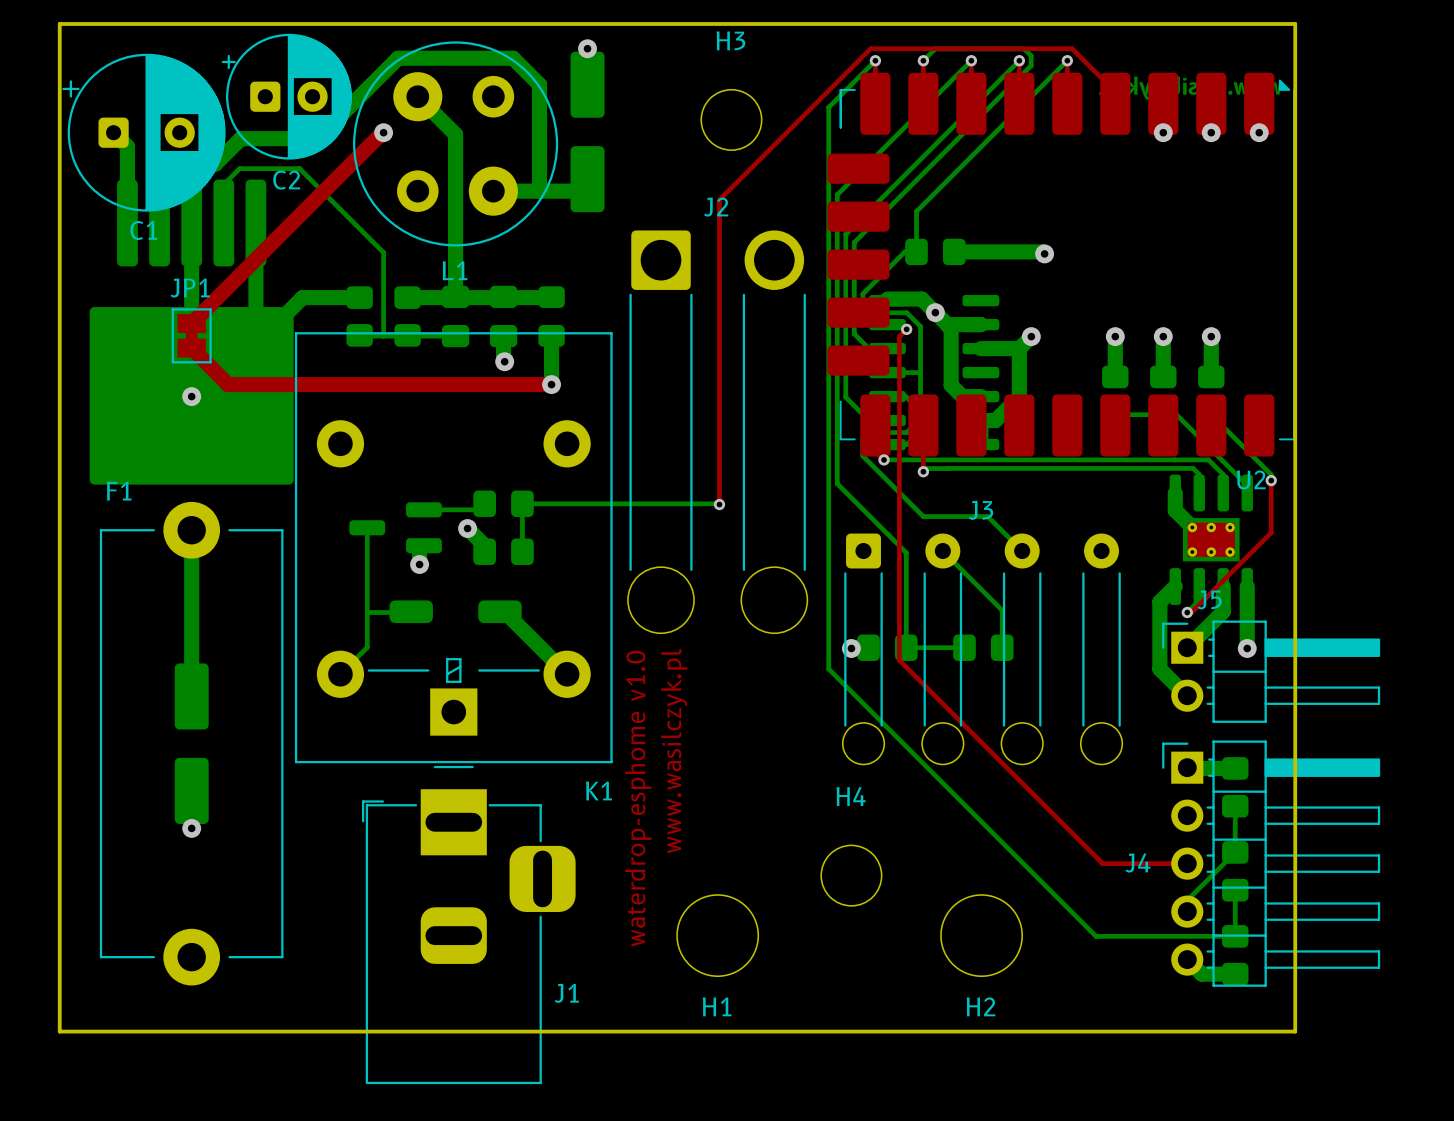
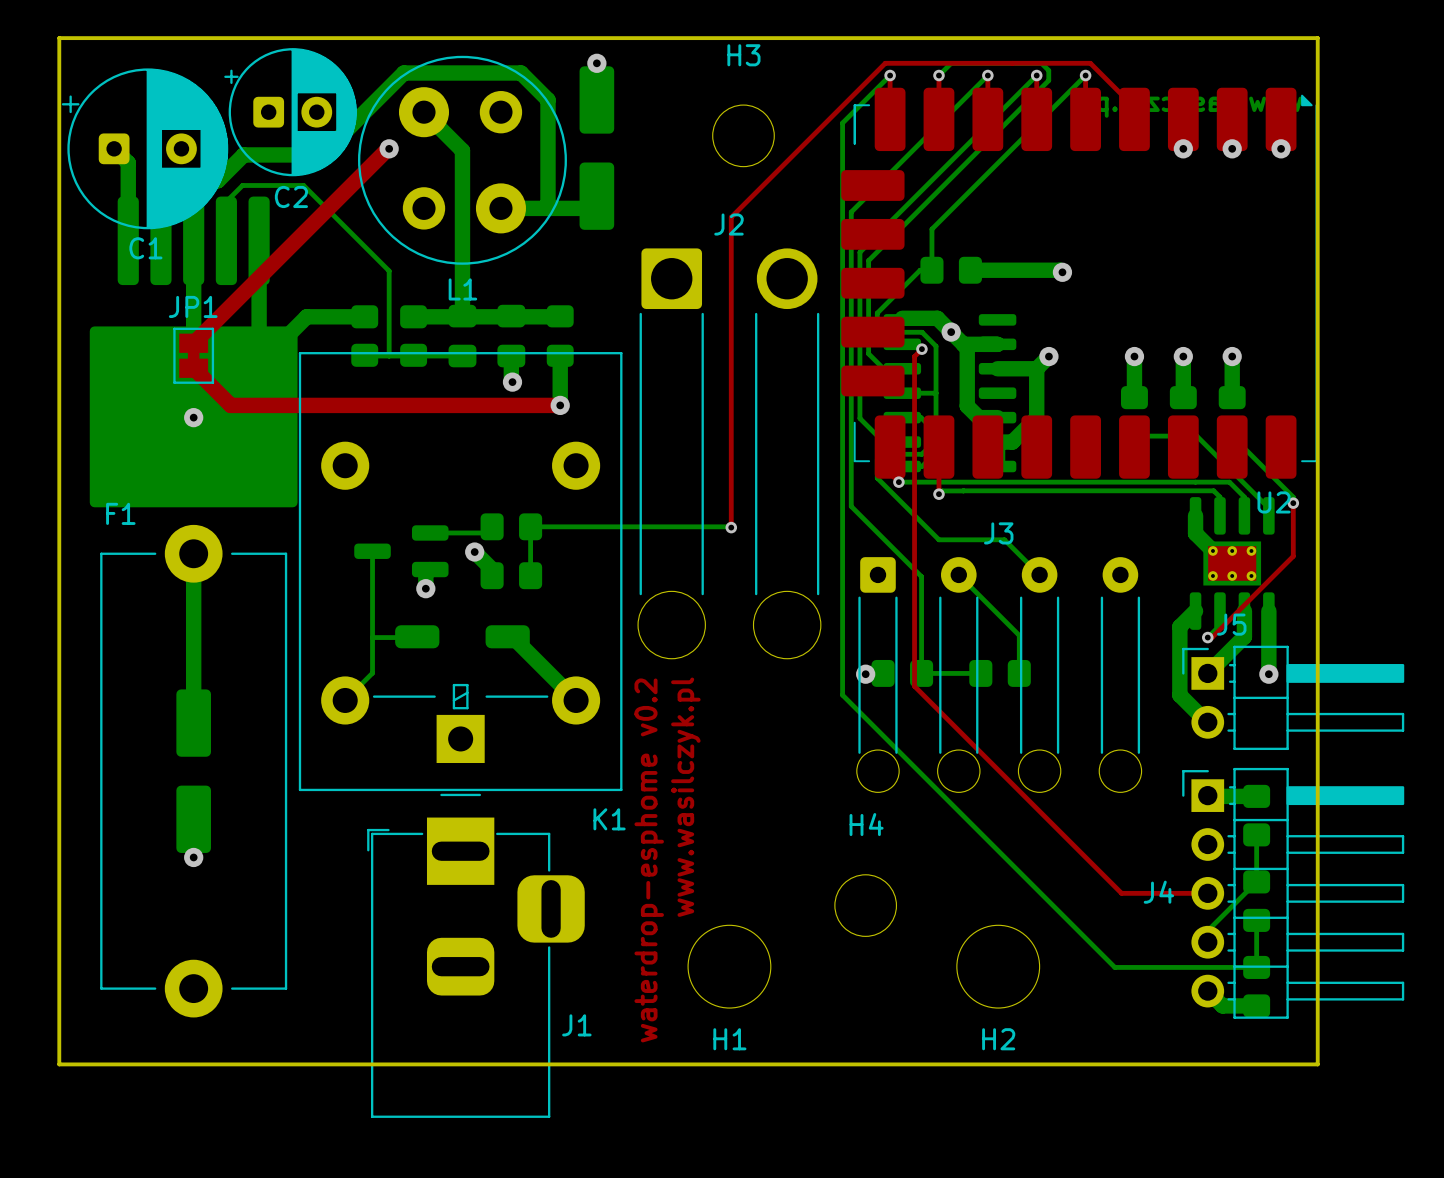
text: waterdrop-esphome v1.0 (638, 798) -> waterdrop-esphome v0.2 (649, 860)

